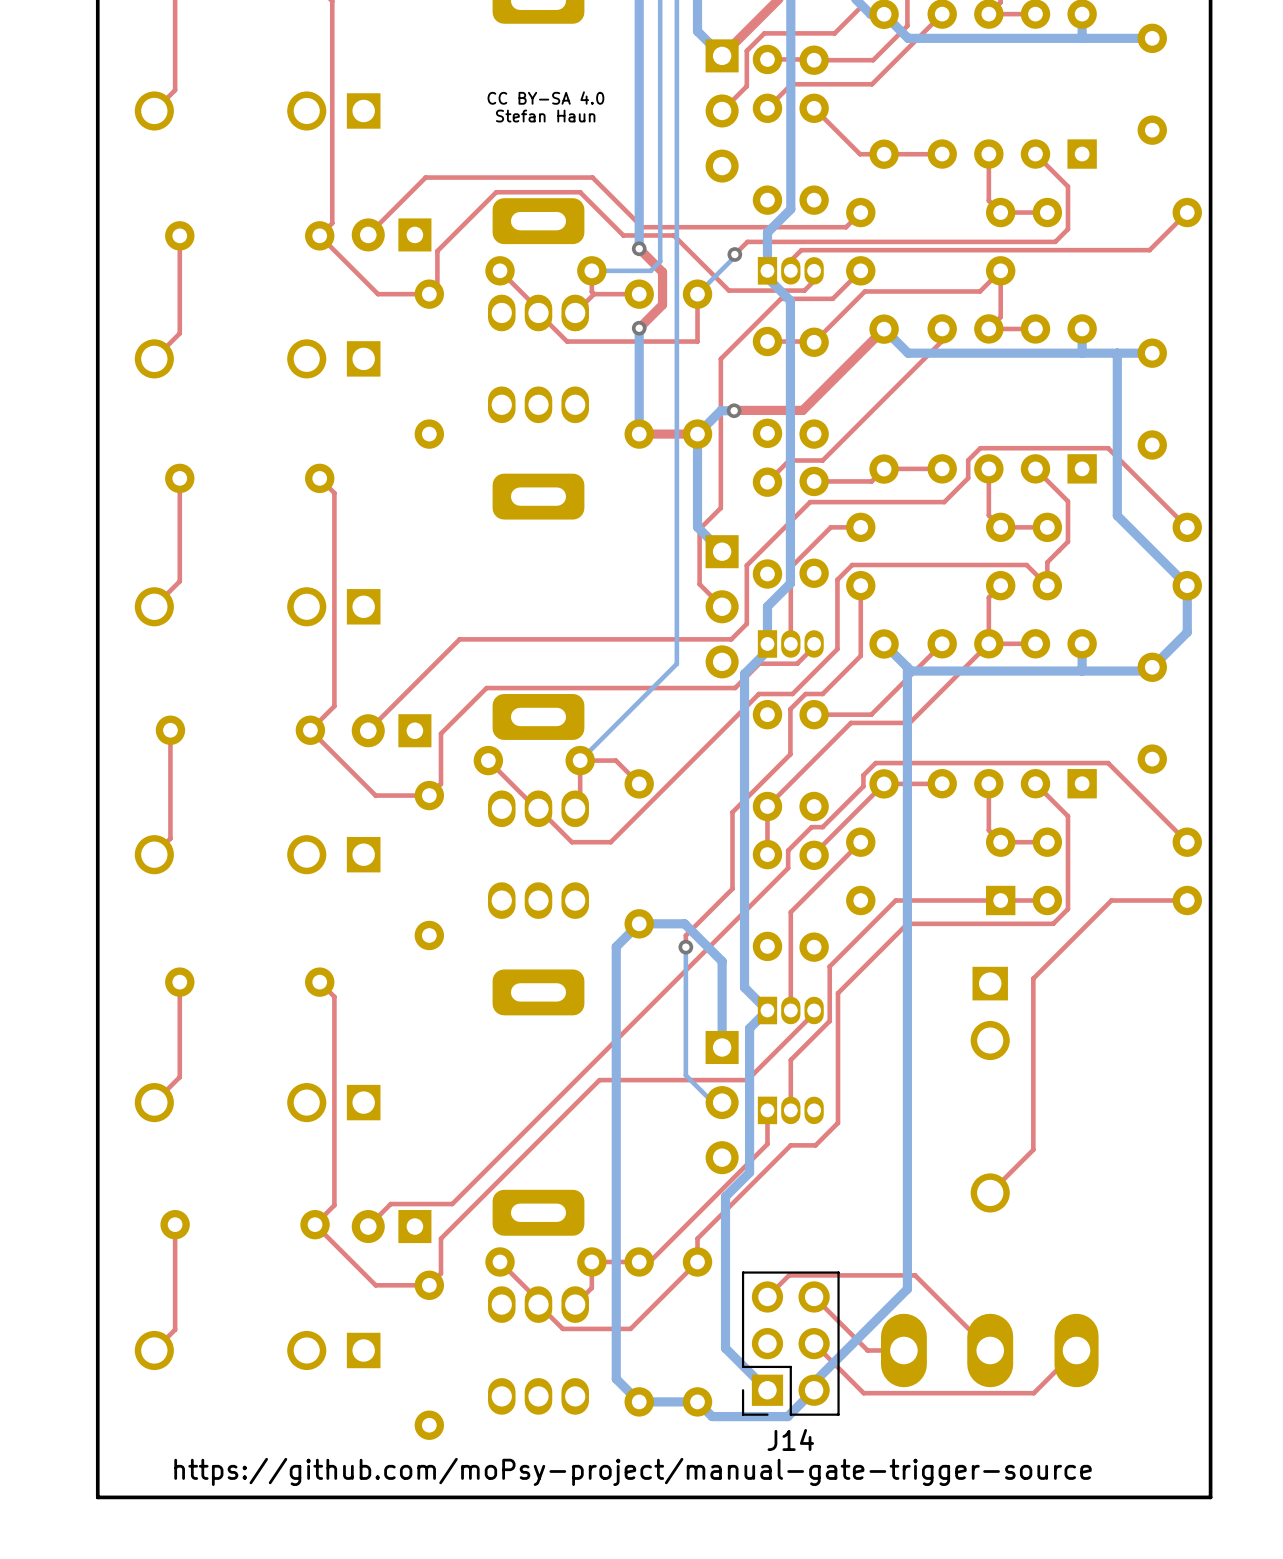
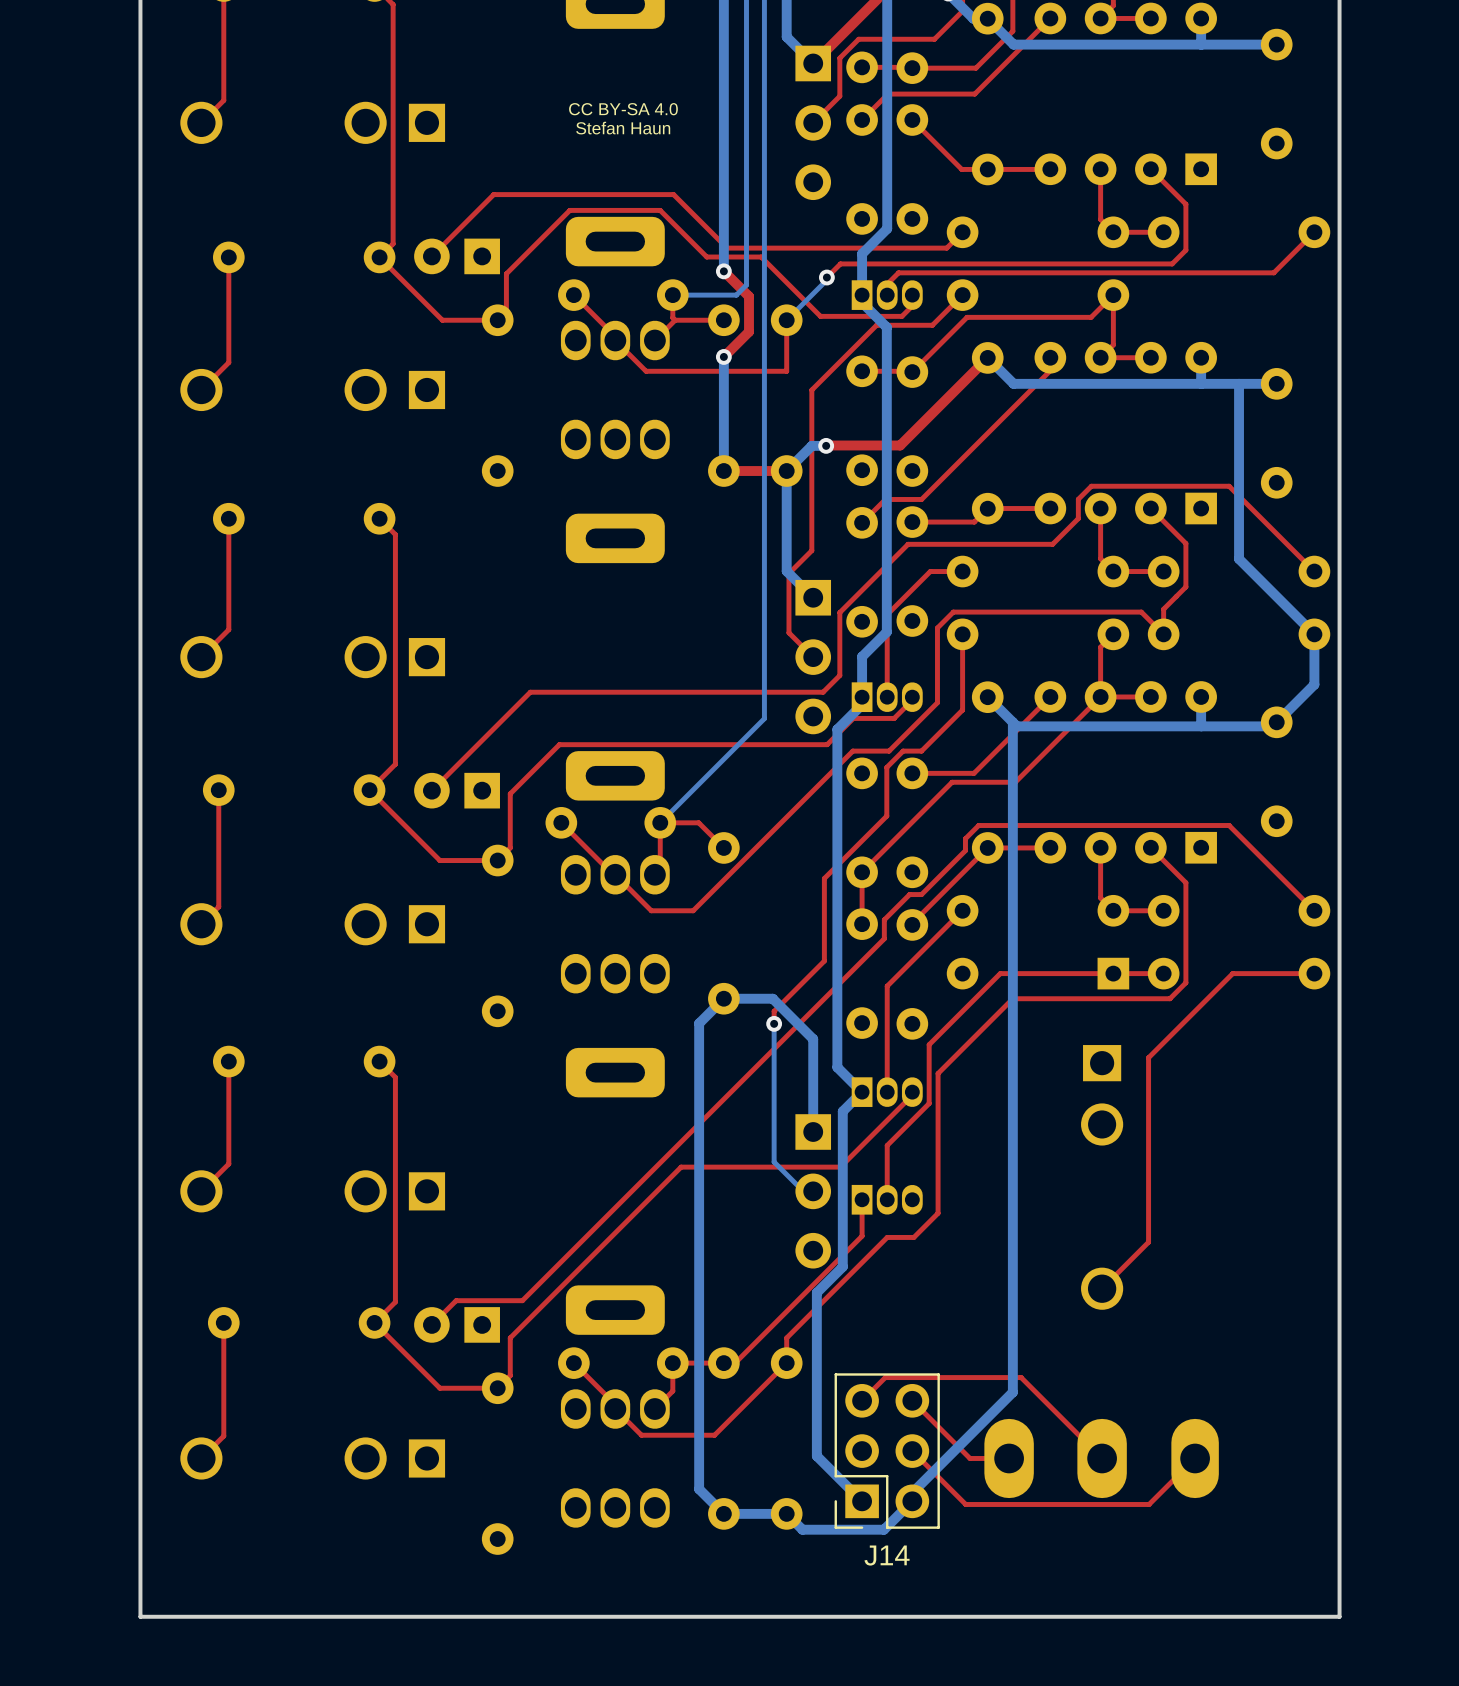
text: https://github.com/moPsy-project/manual-gate-trigger-source (633, 1471) -> none

